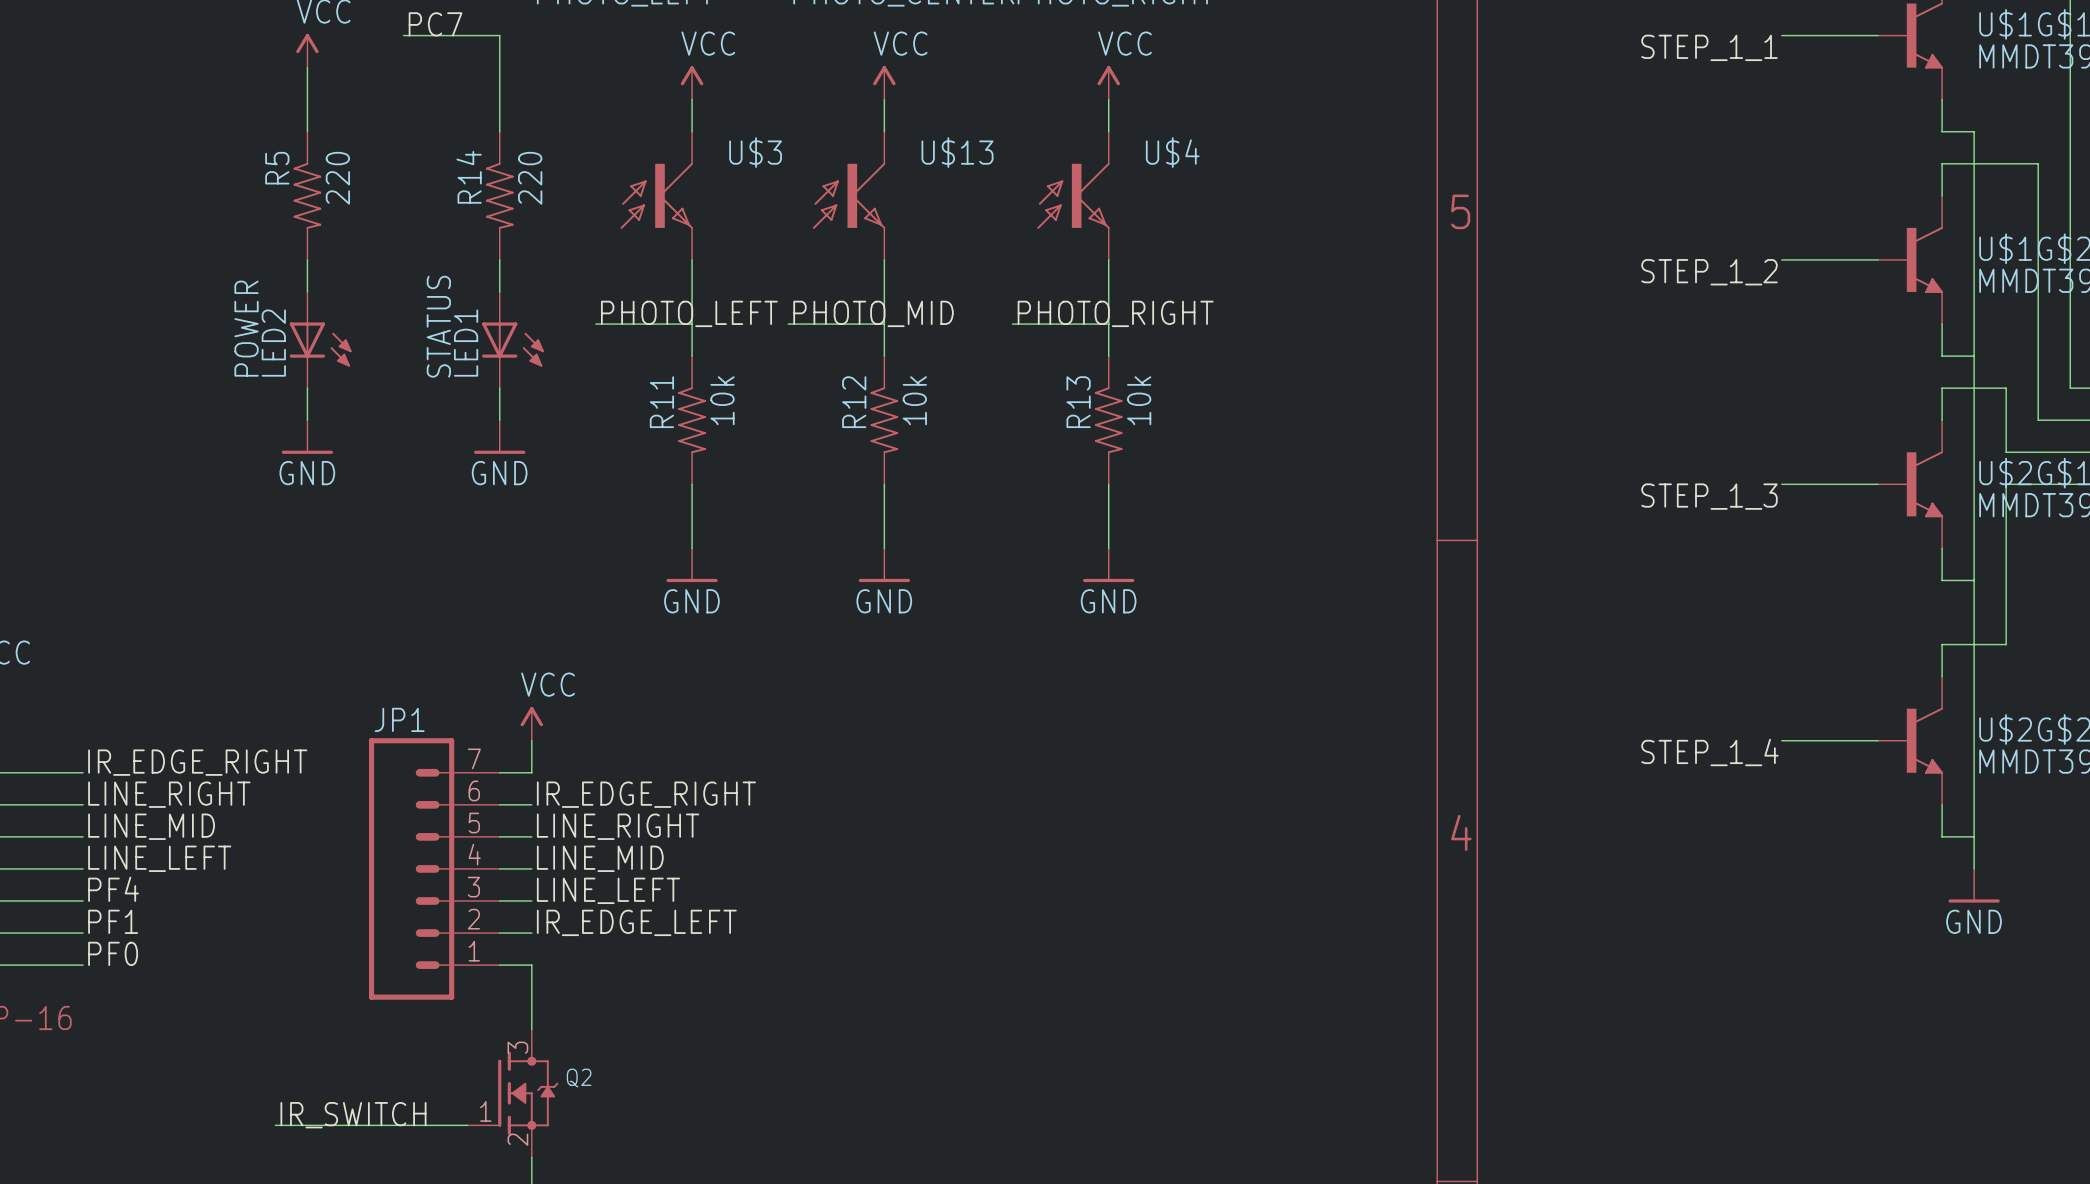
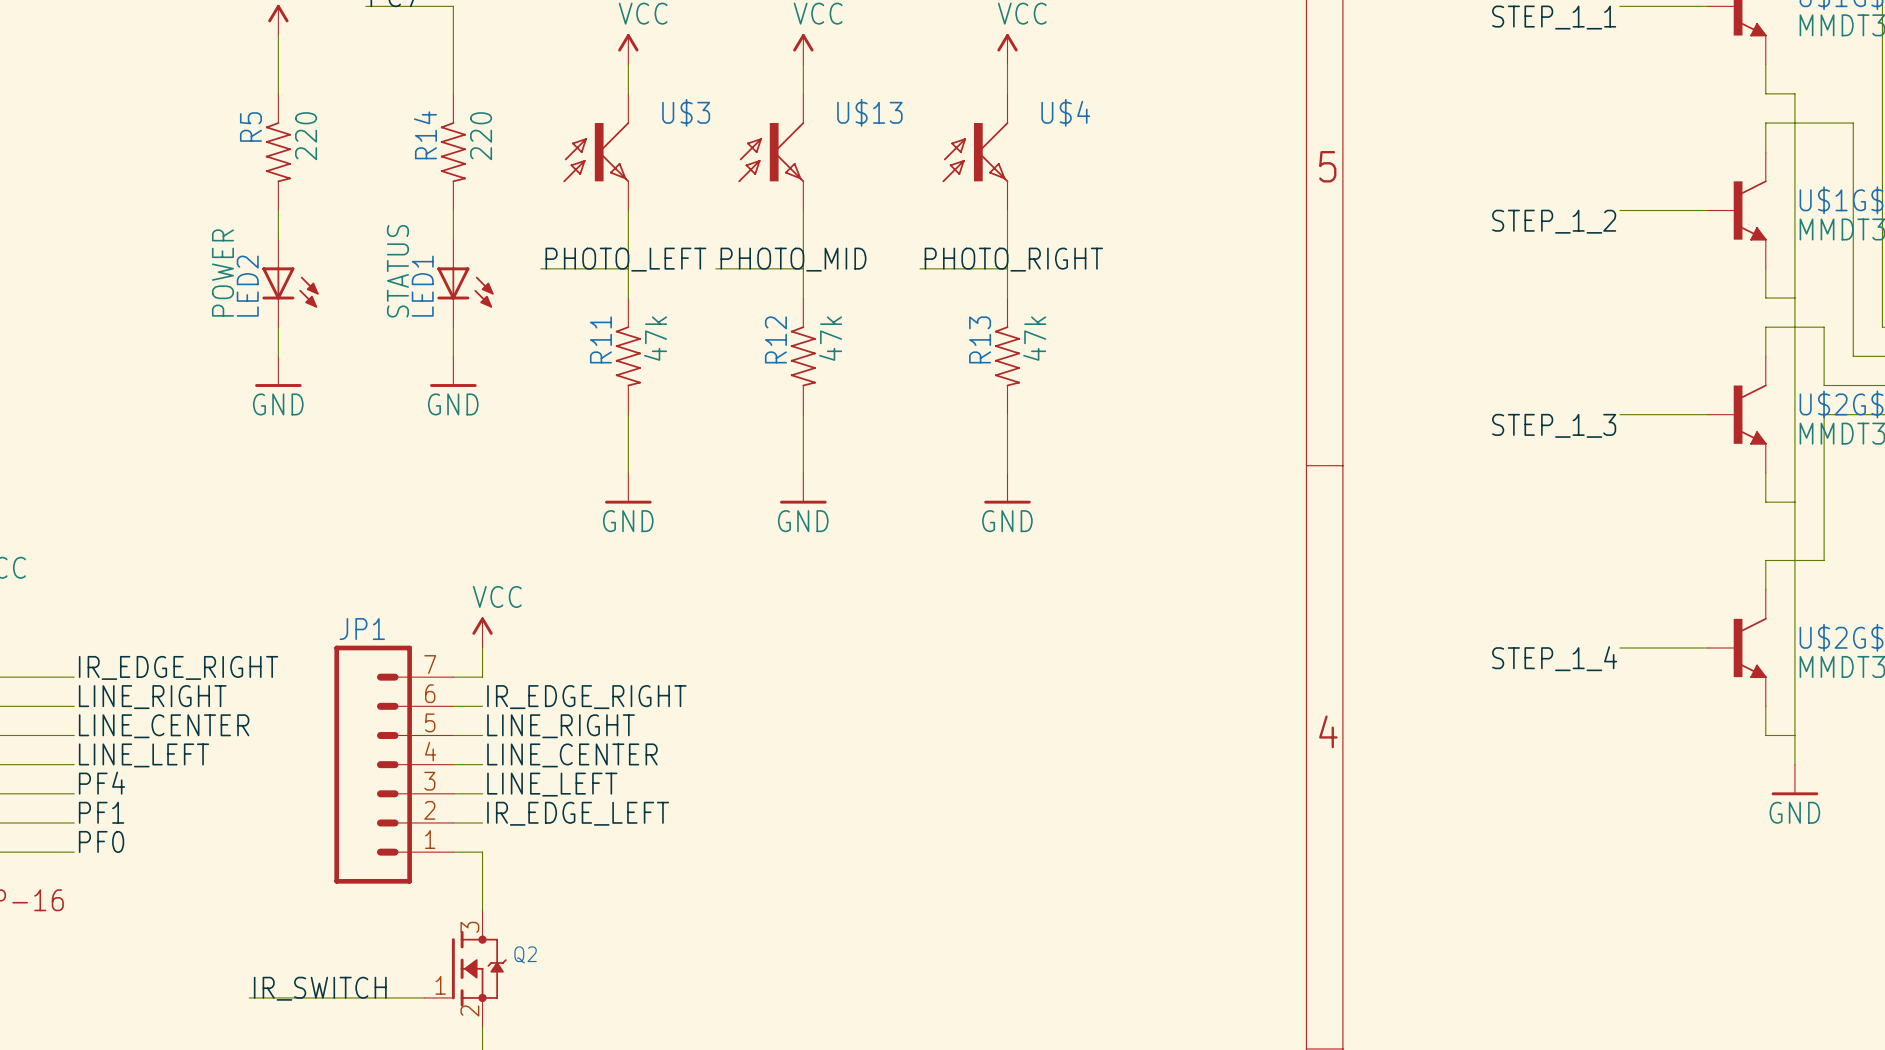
R11 value: 10k (722, 400) -> 47k (655, 338)
R12 value: 10k (914, 400) -> 47k (830, 338)
R13 value: 10k (1139, 400) -> 47k (1034, 338)
label: LINE_MID (151, 826) -> LINE_CENTER (164, 726)
label: LINE_MID (600, 858) -> LINE_CENTER (572, 755)

